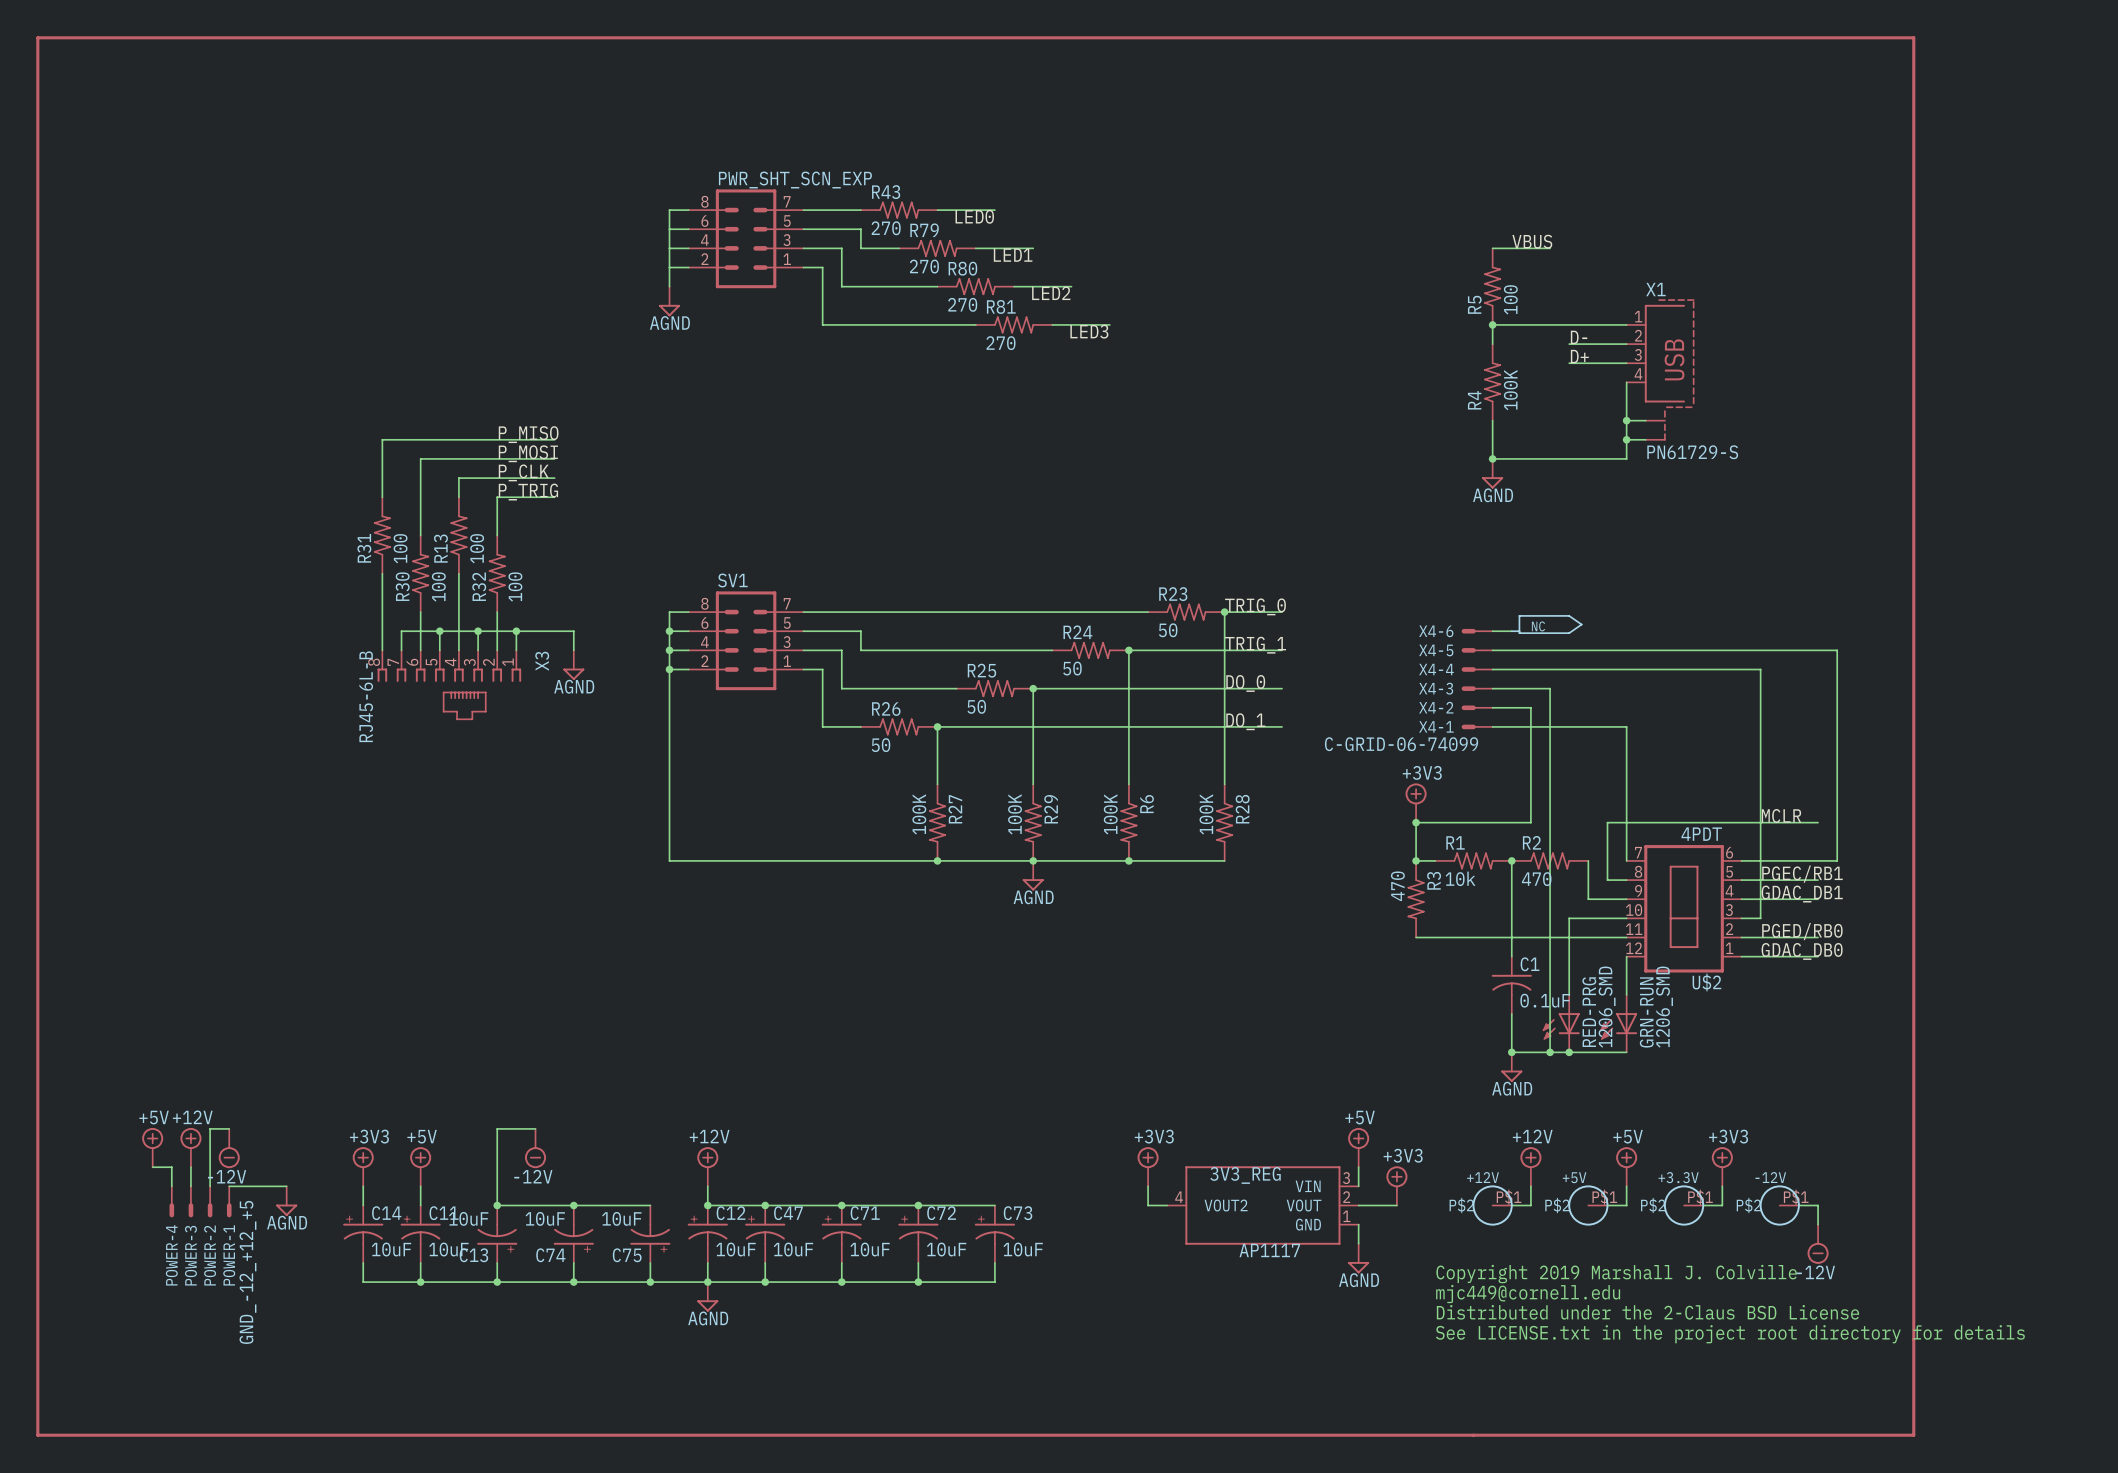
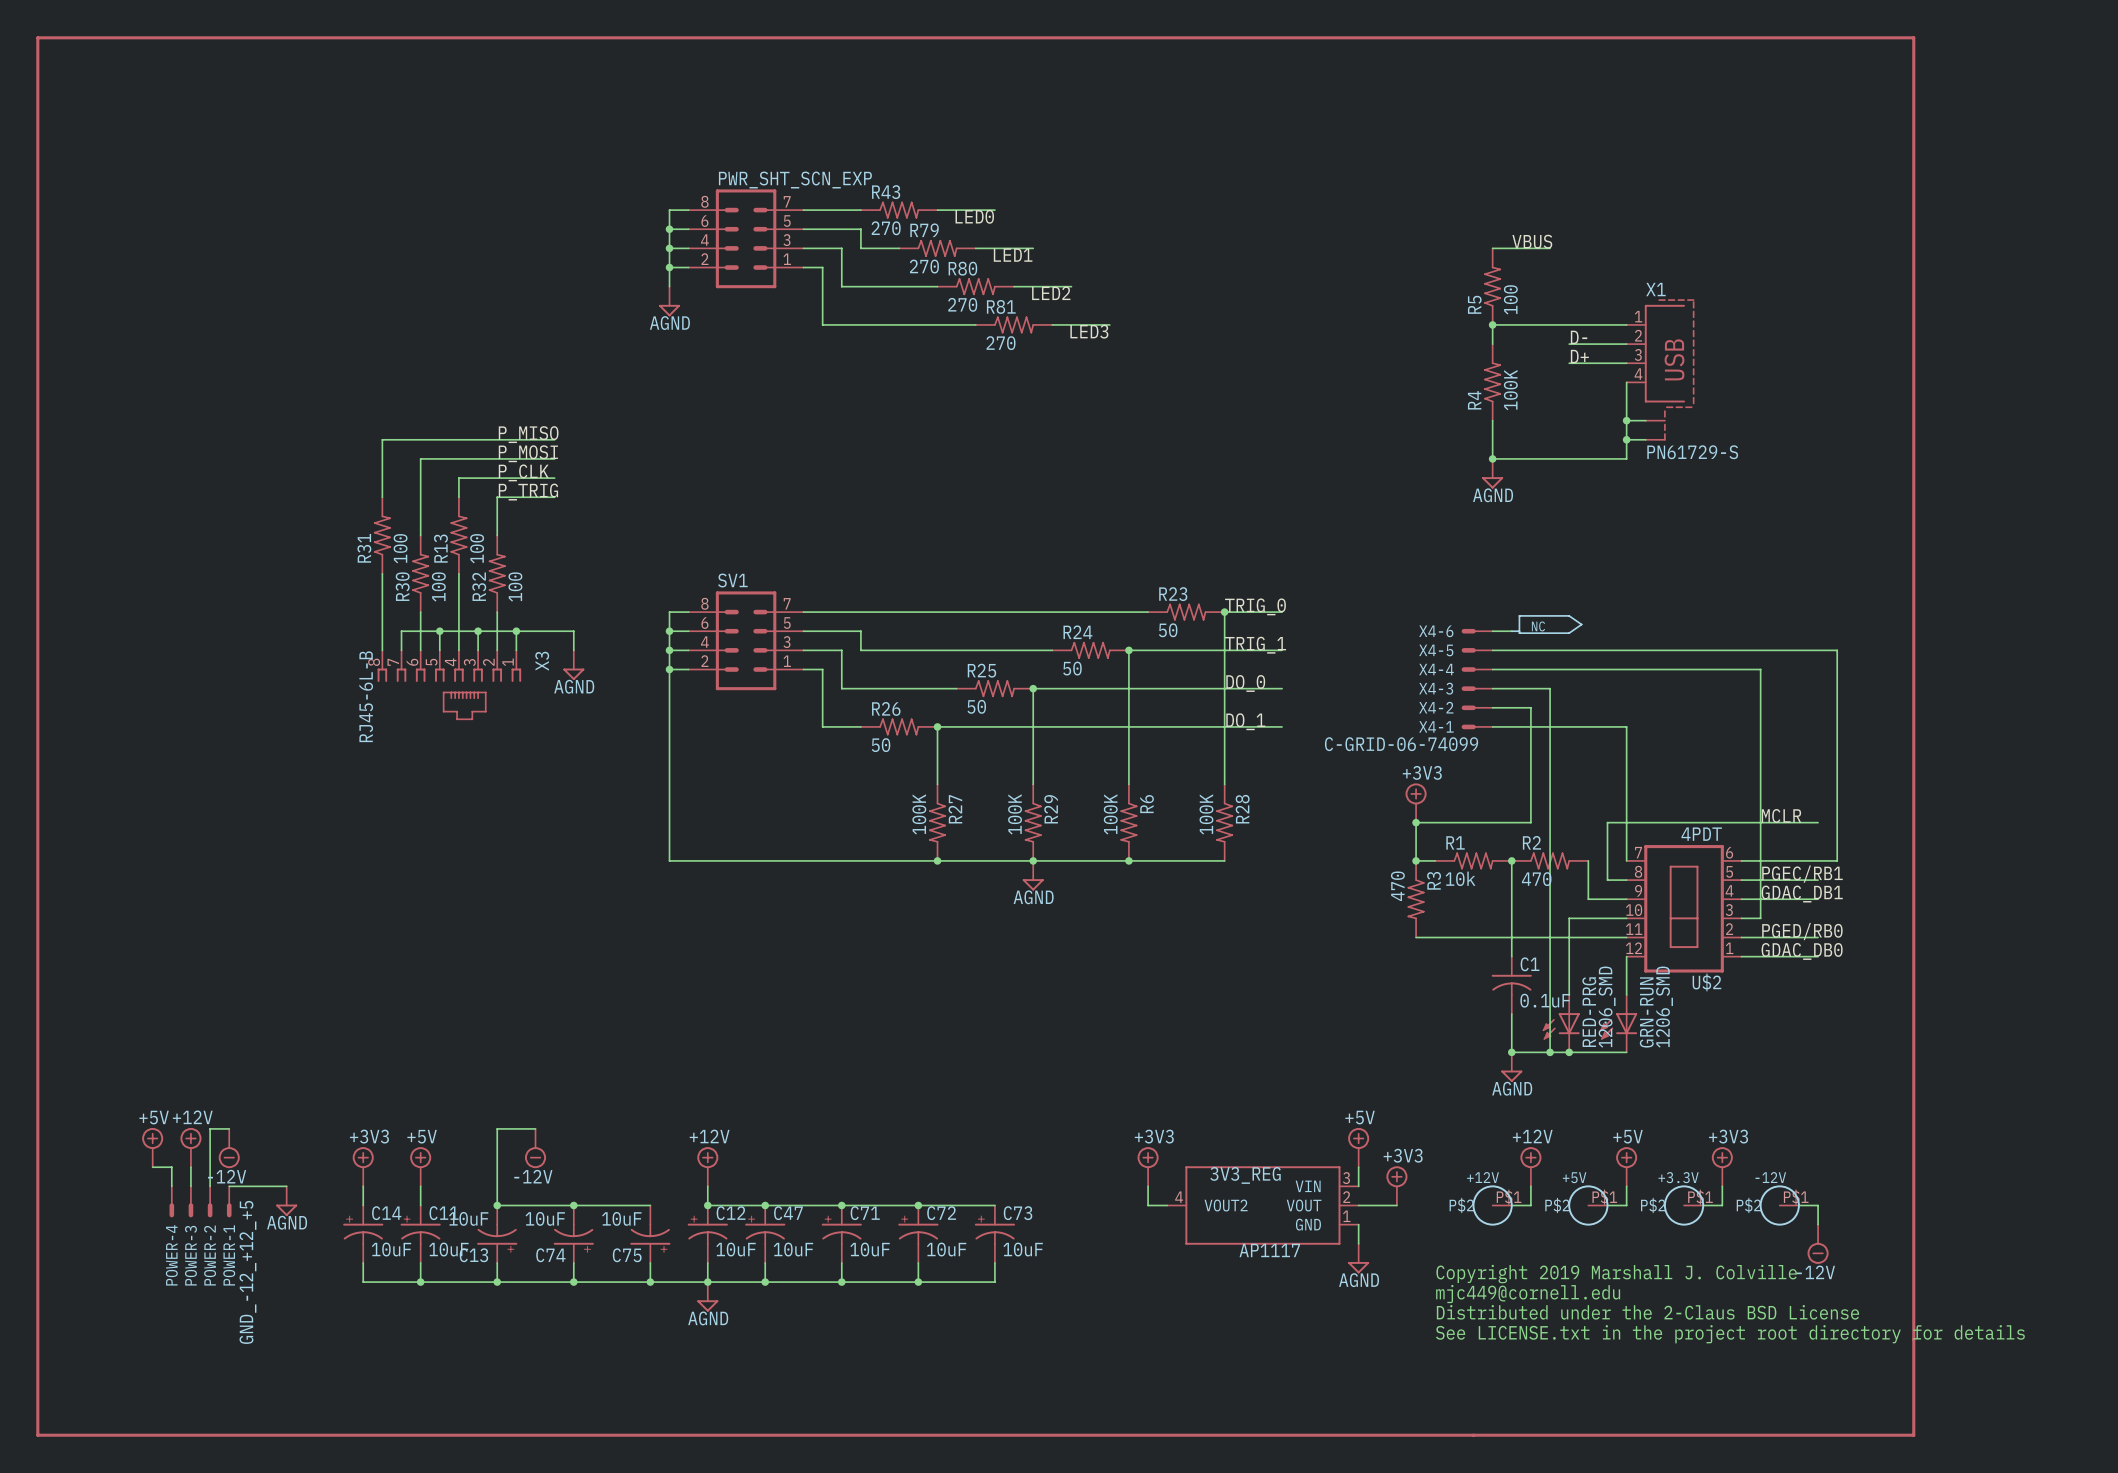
junction: none -> (669, 229)
junction: none -> (669, 248)
junction: none -> (669, 267)

